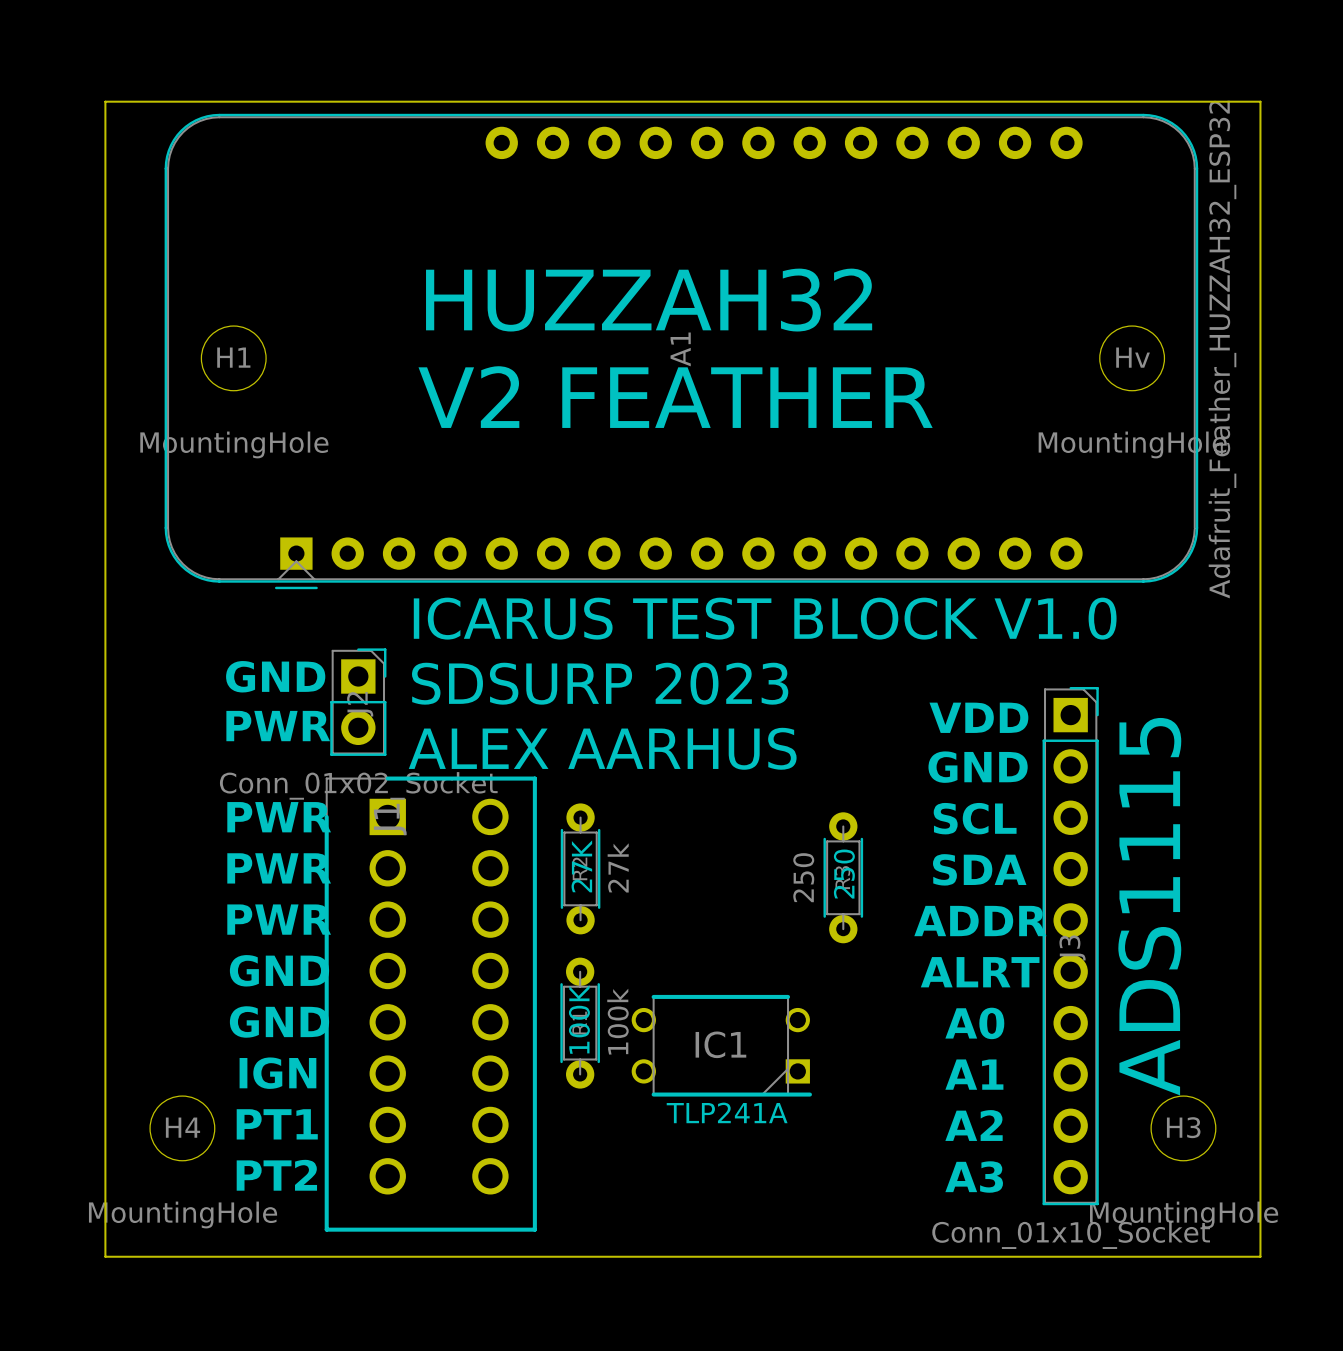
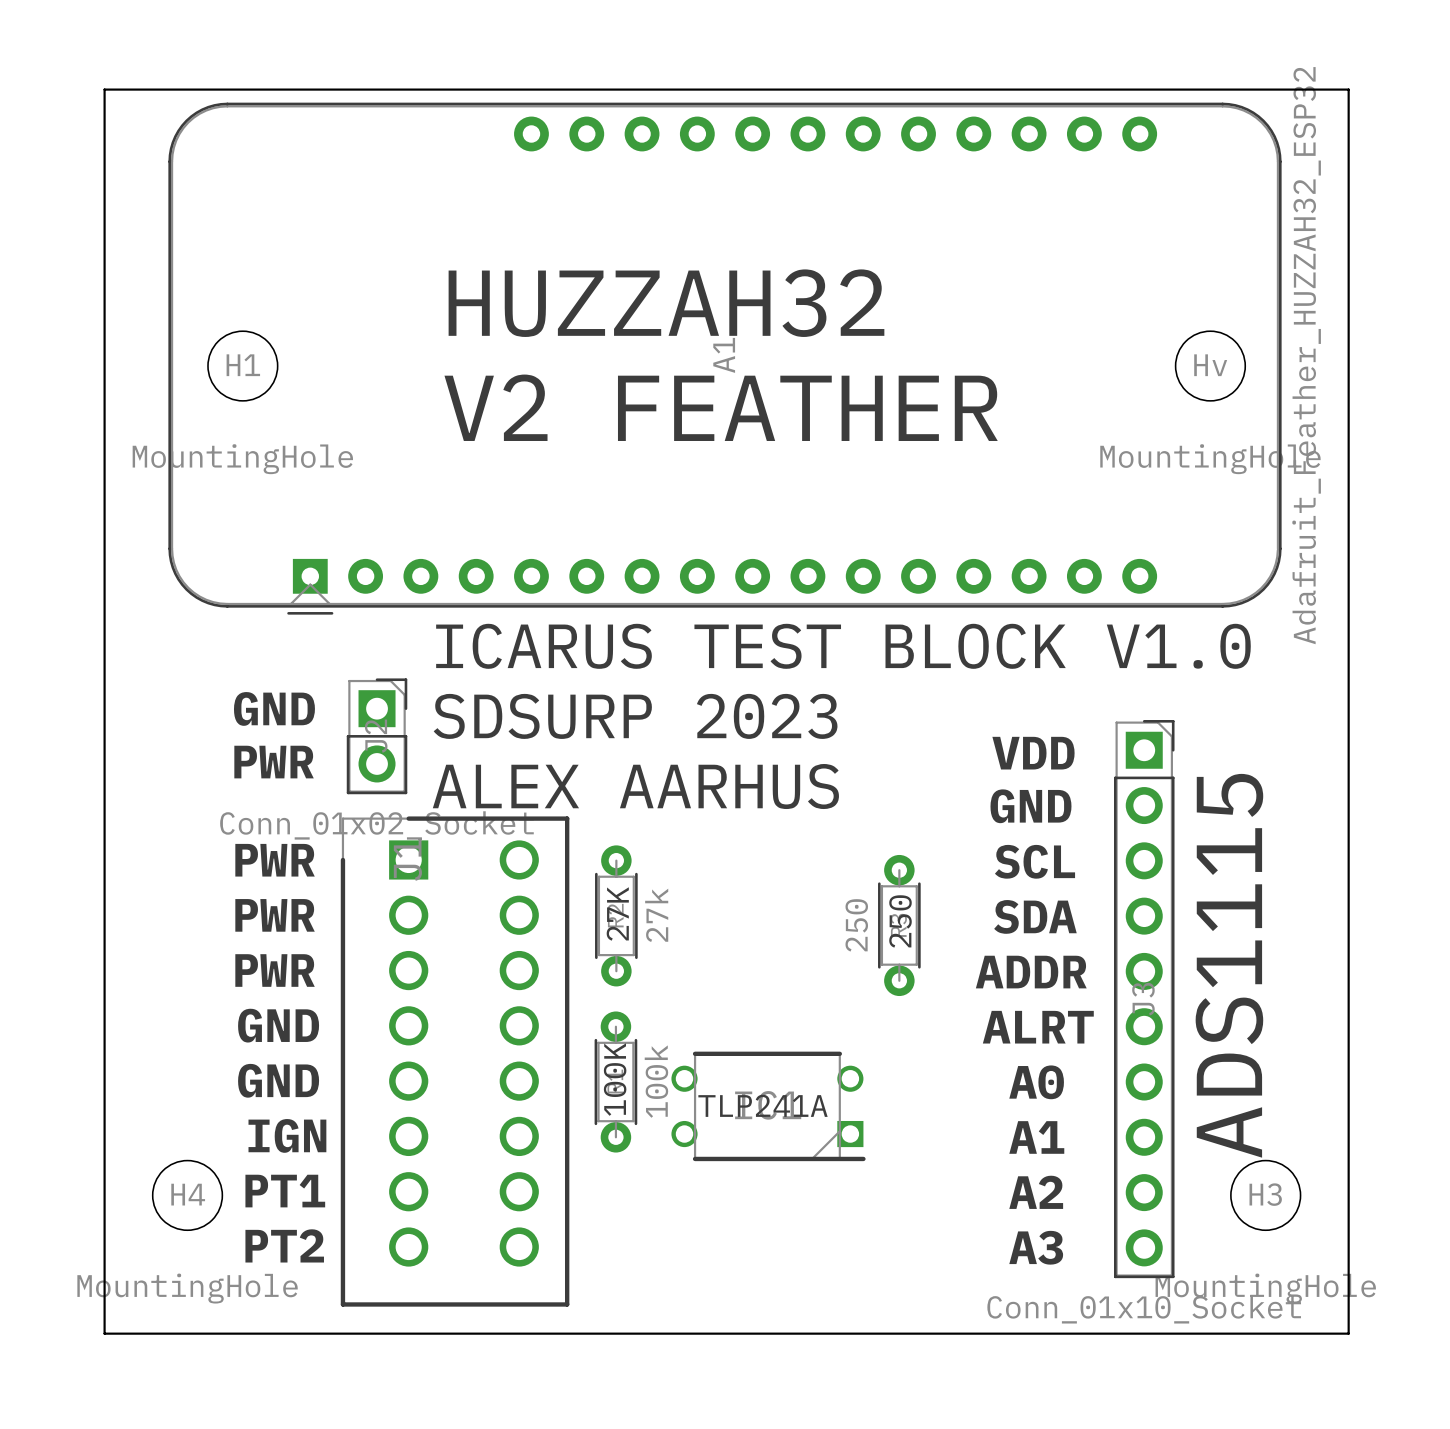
text position: TLP241A (727, 1112) -> TLP241A (763, 1105)

